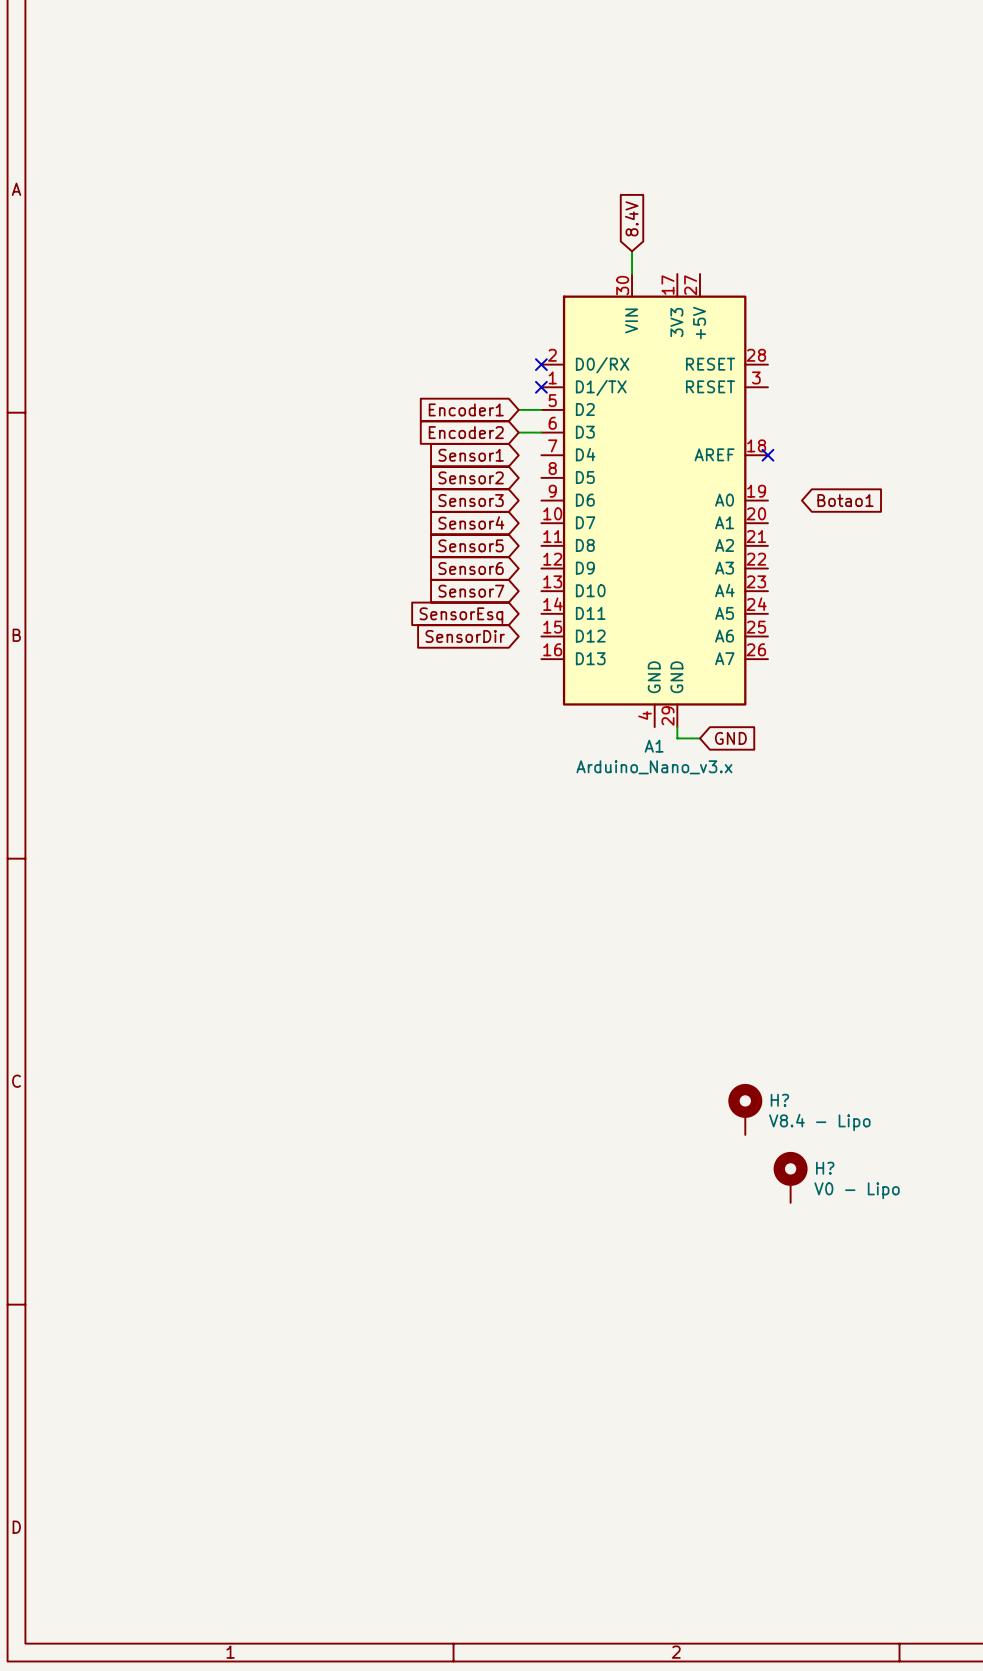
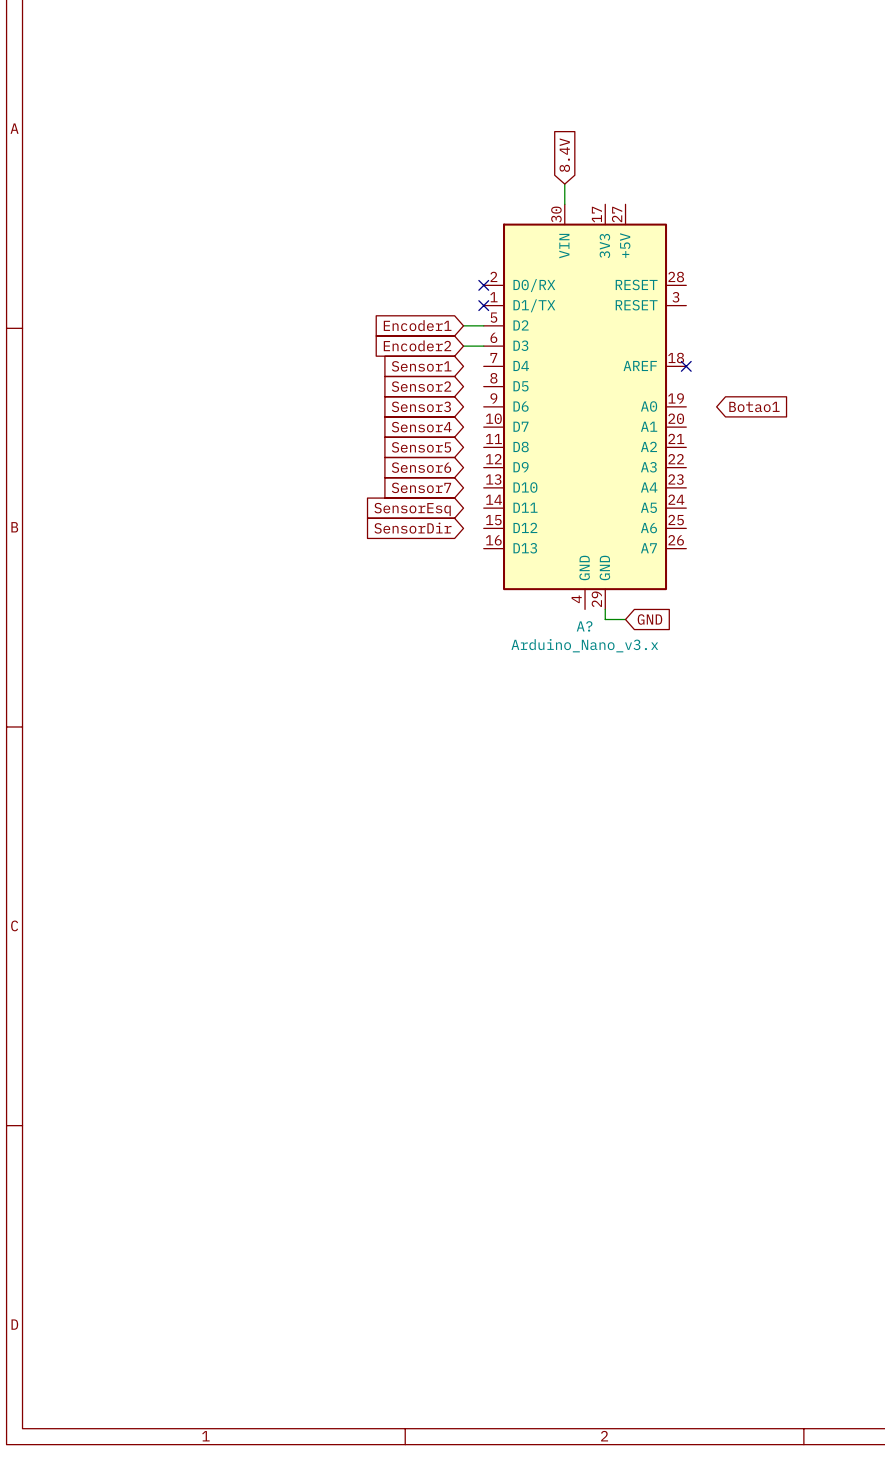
A1 name: A1 (654, 746) -> A? (584, 626)
H?: V8.4 - Lipo (745, 1109) -> none
H?: V0 - Lipo (790, 1177) -> none

